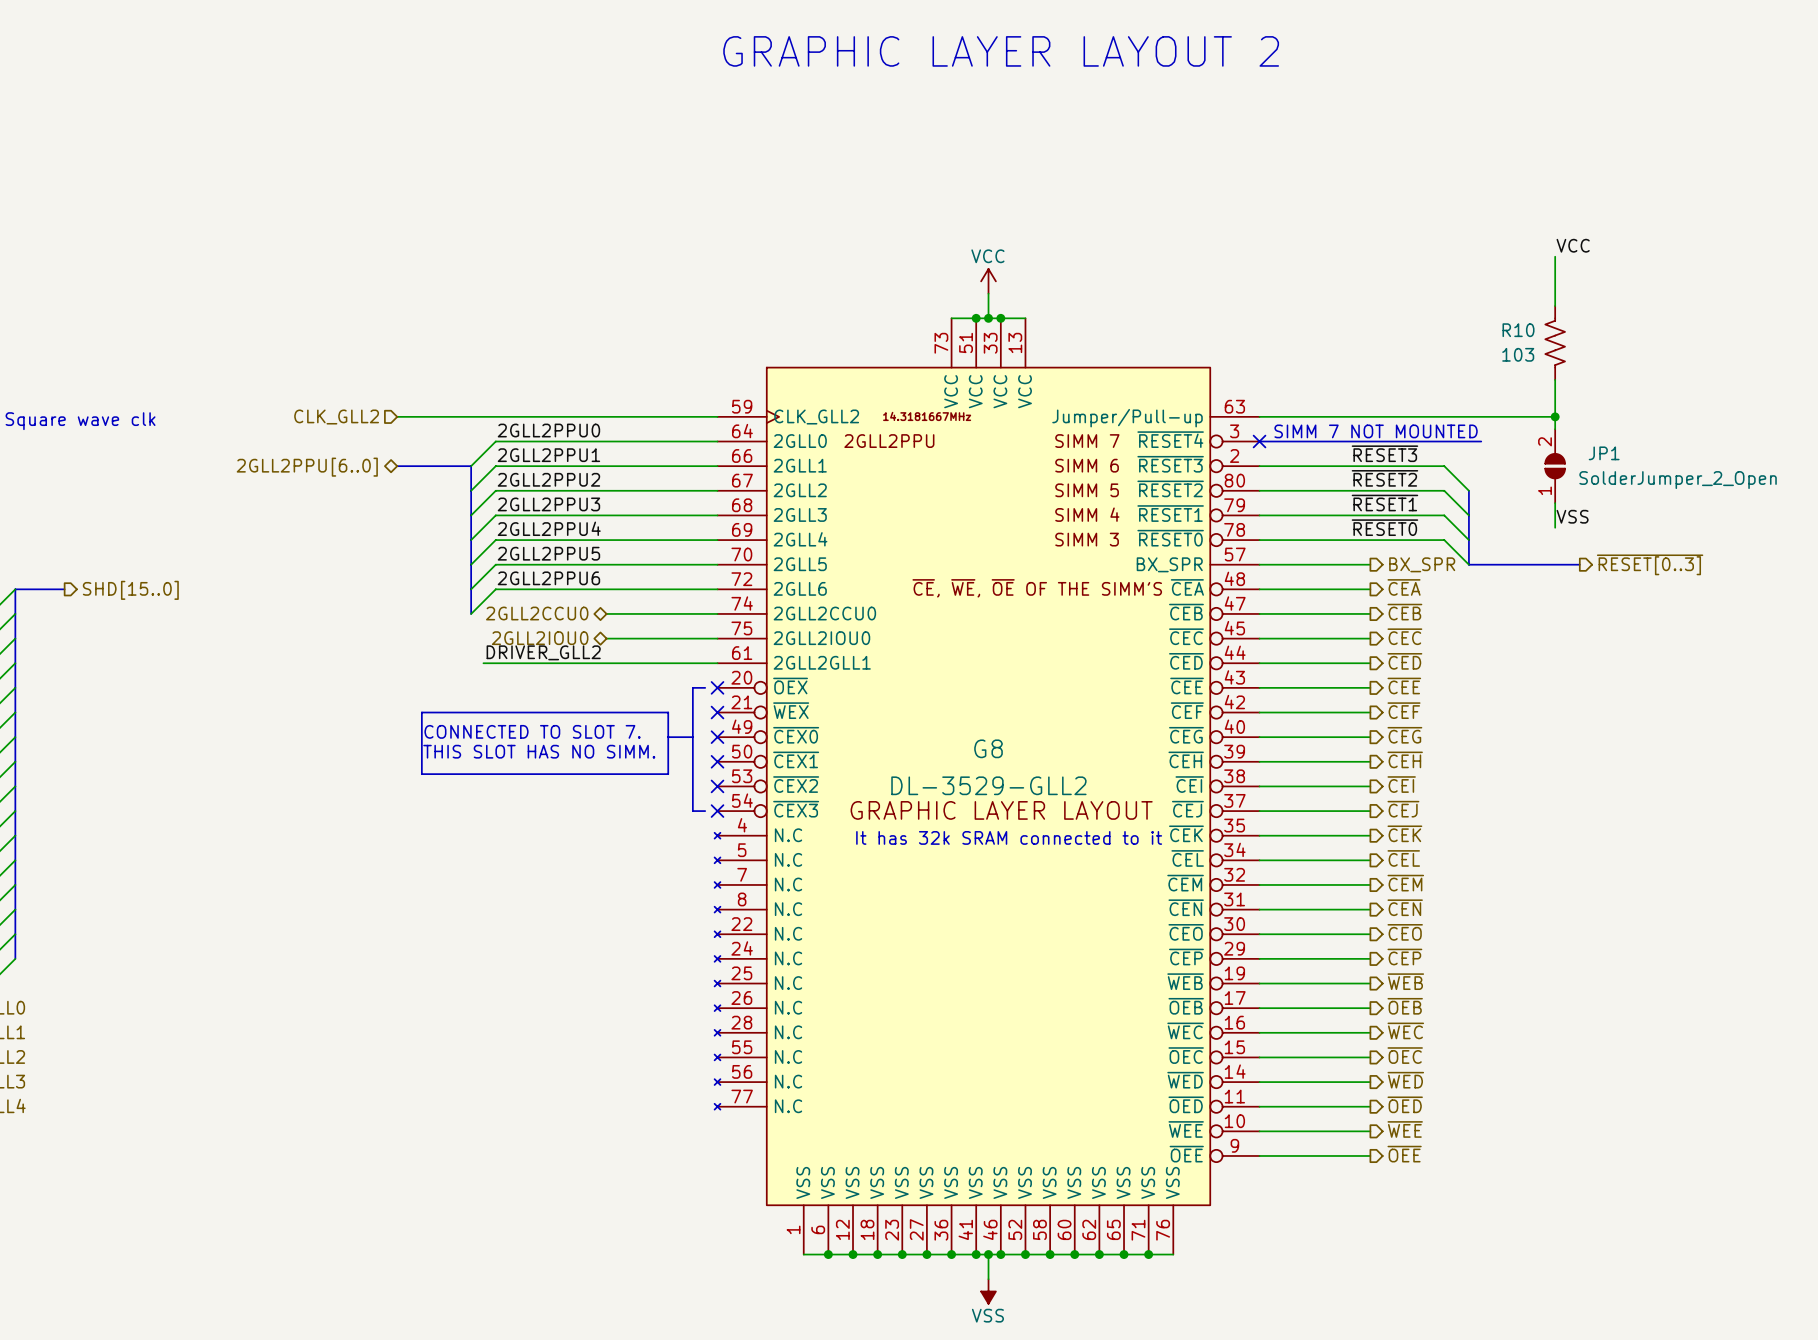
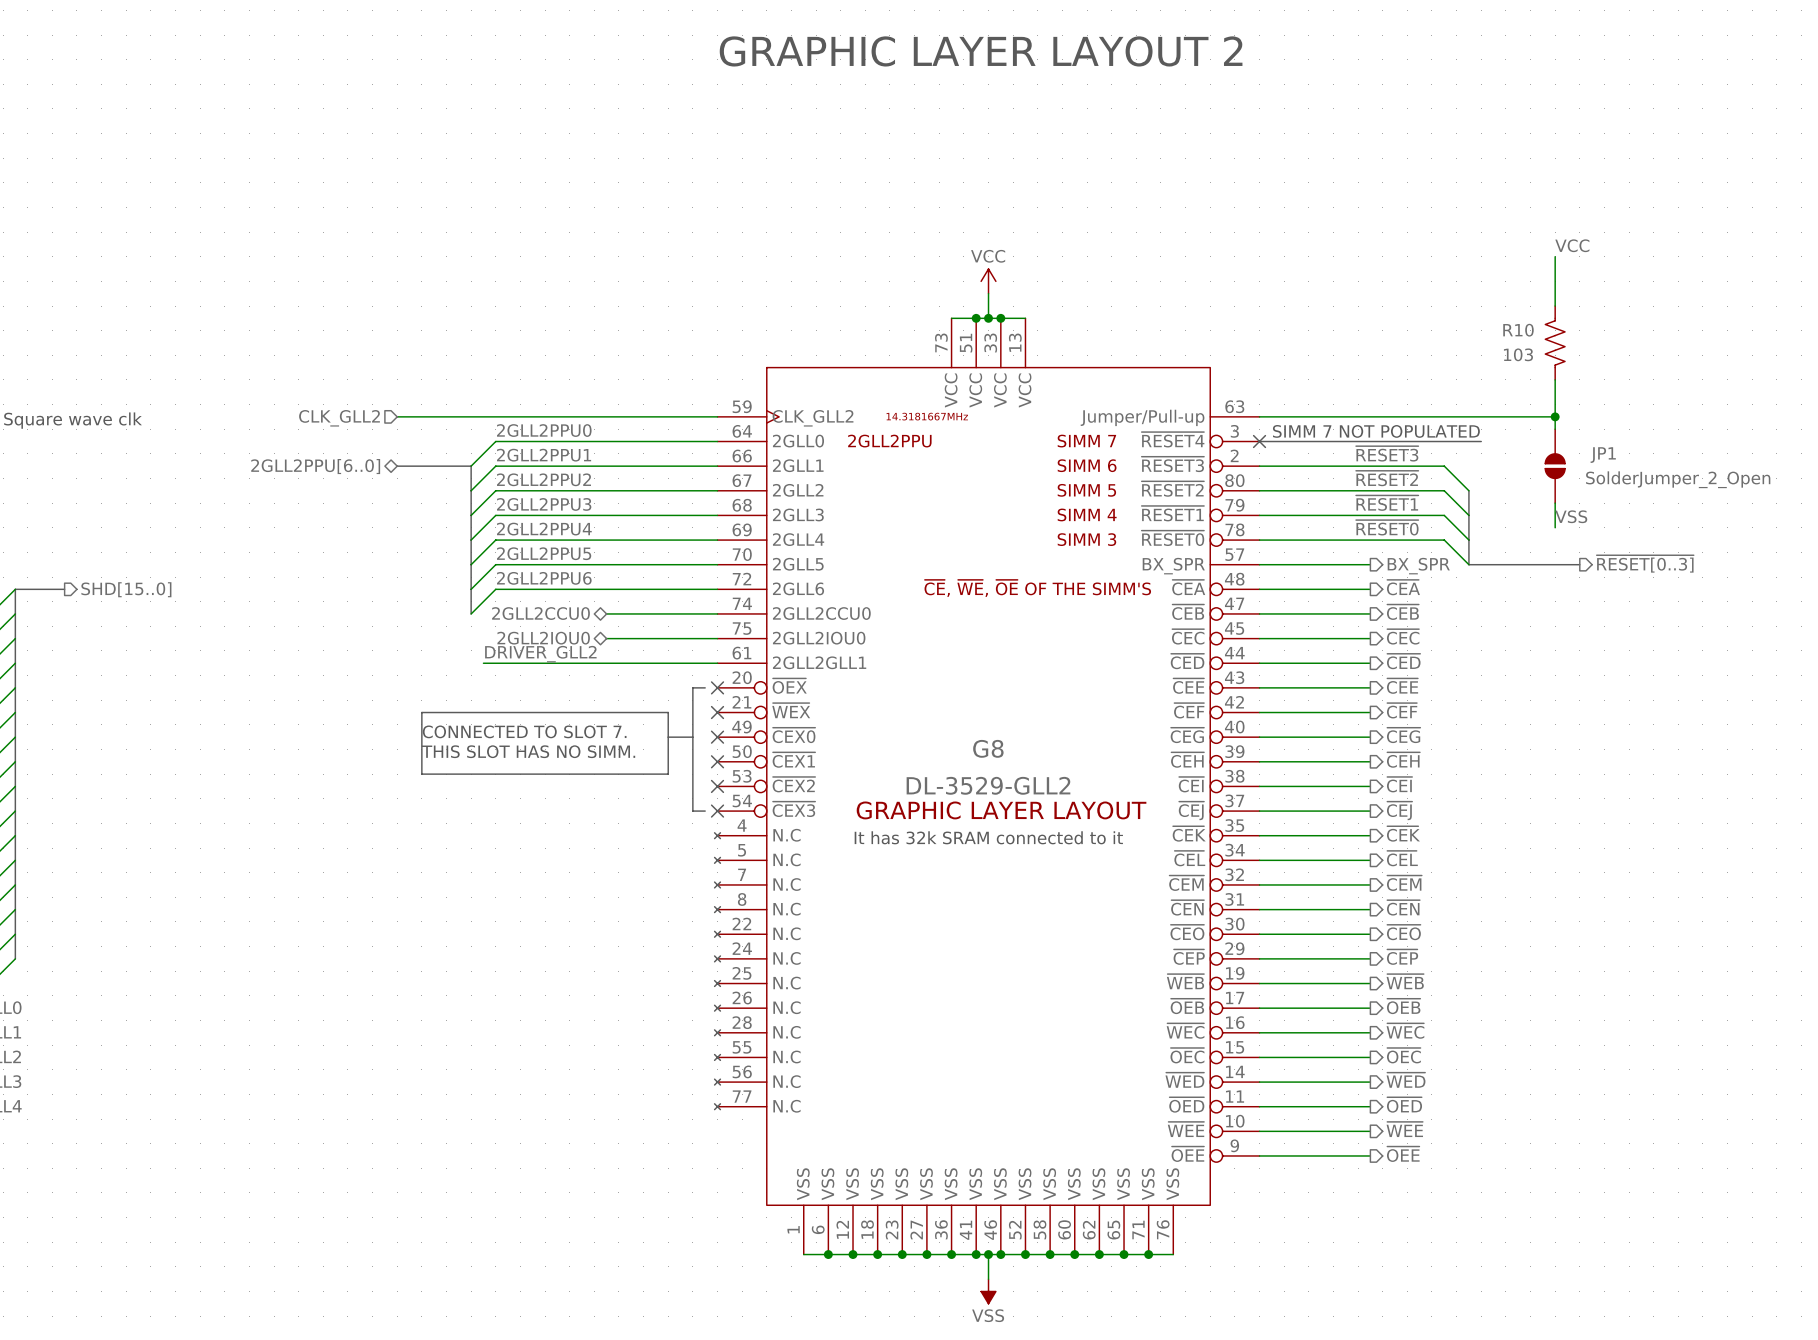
text: SIMM 7 NOT MOUNTED (1376, 431) -> SIMM 7 NOT POPULATED (1376, 431)
JP1 pin number: 2 (1545, 441) -> none
JP1 pin number: 1 (1545, 490) -> none

